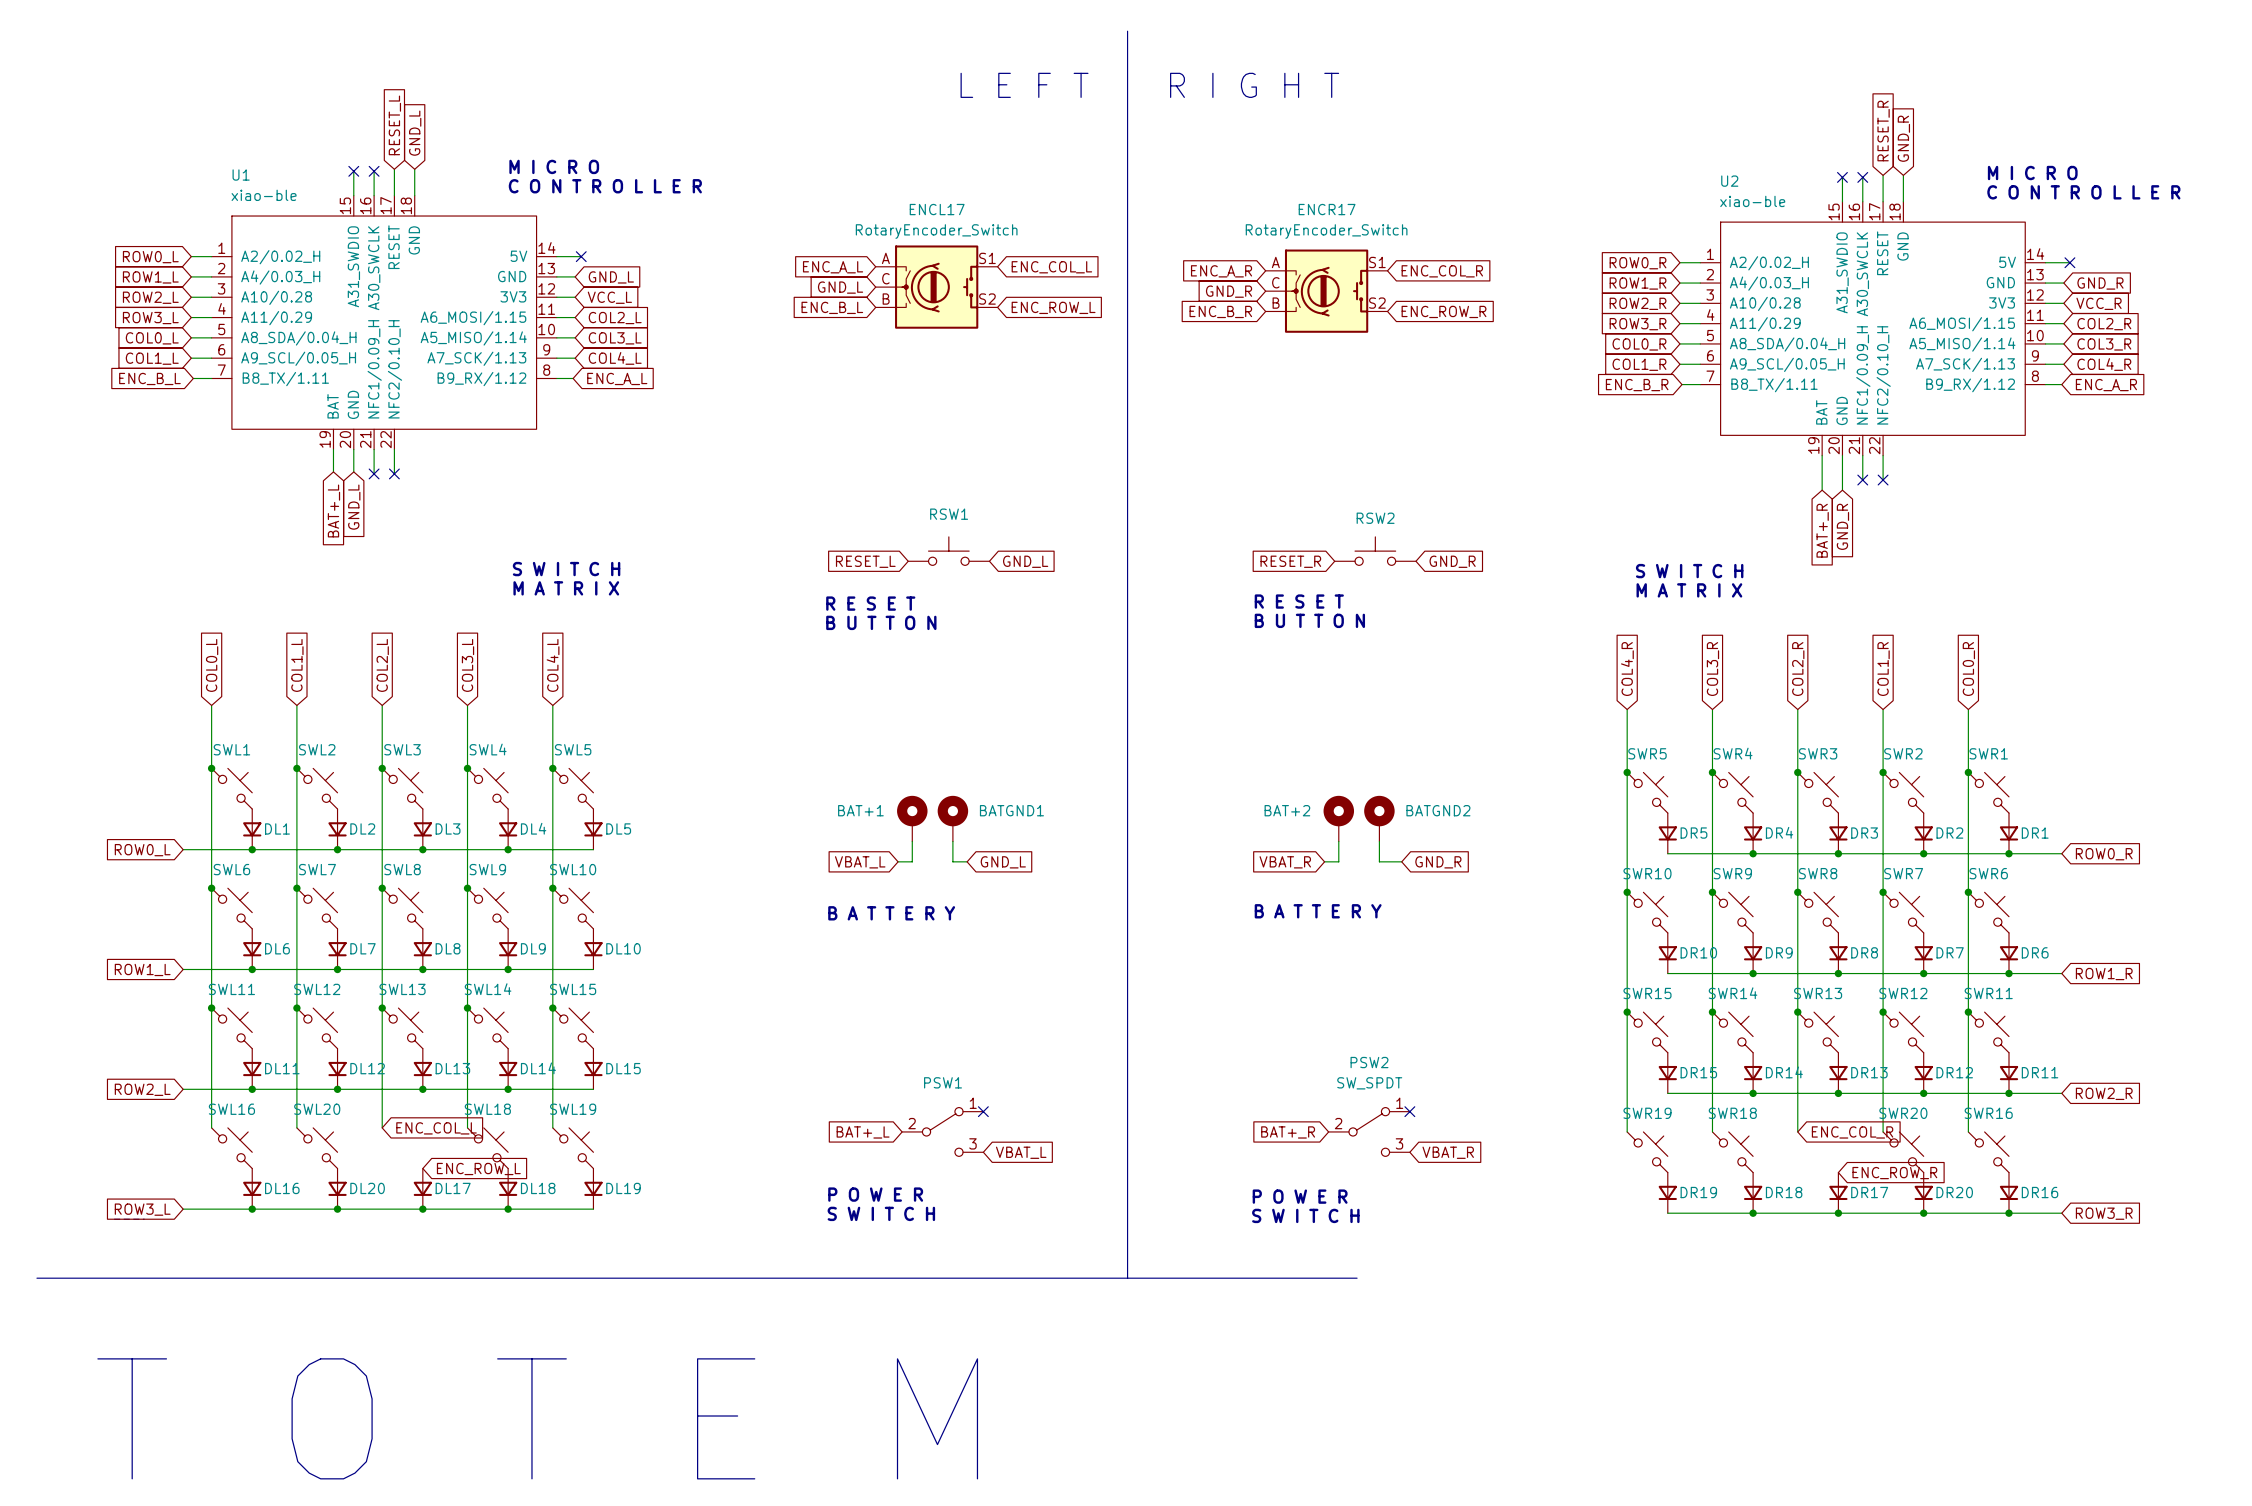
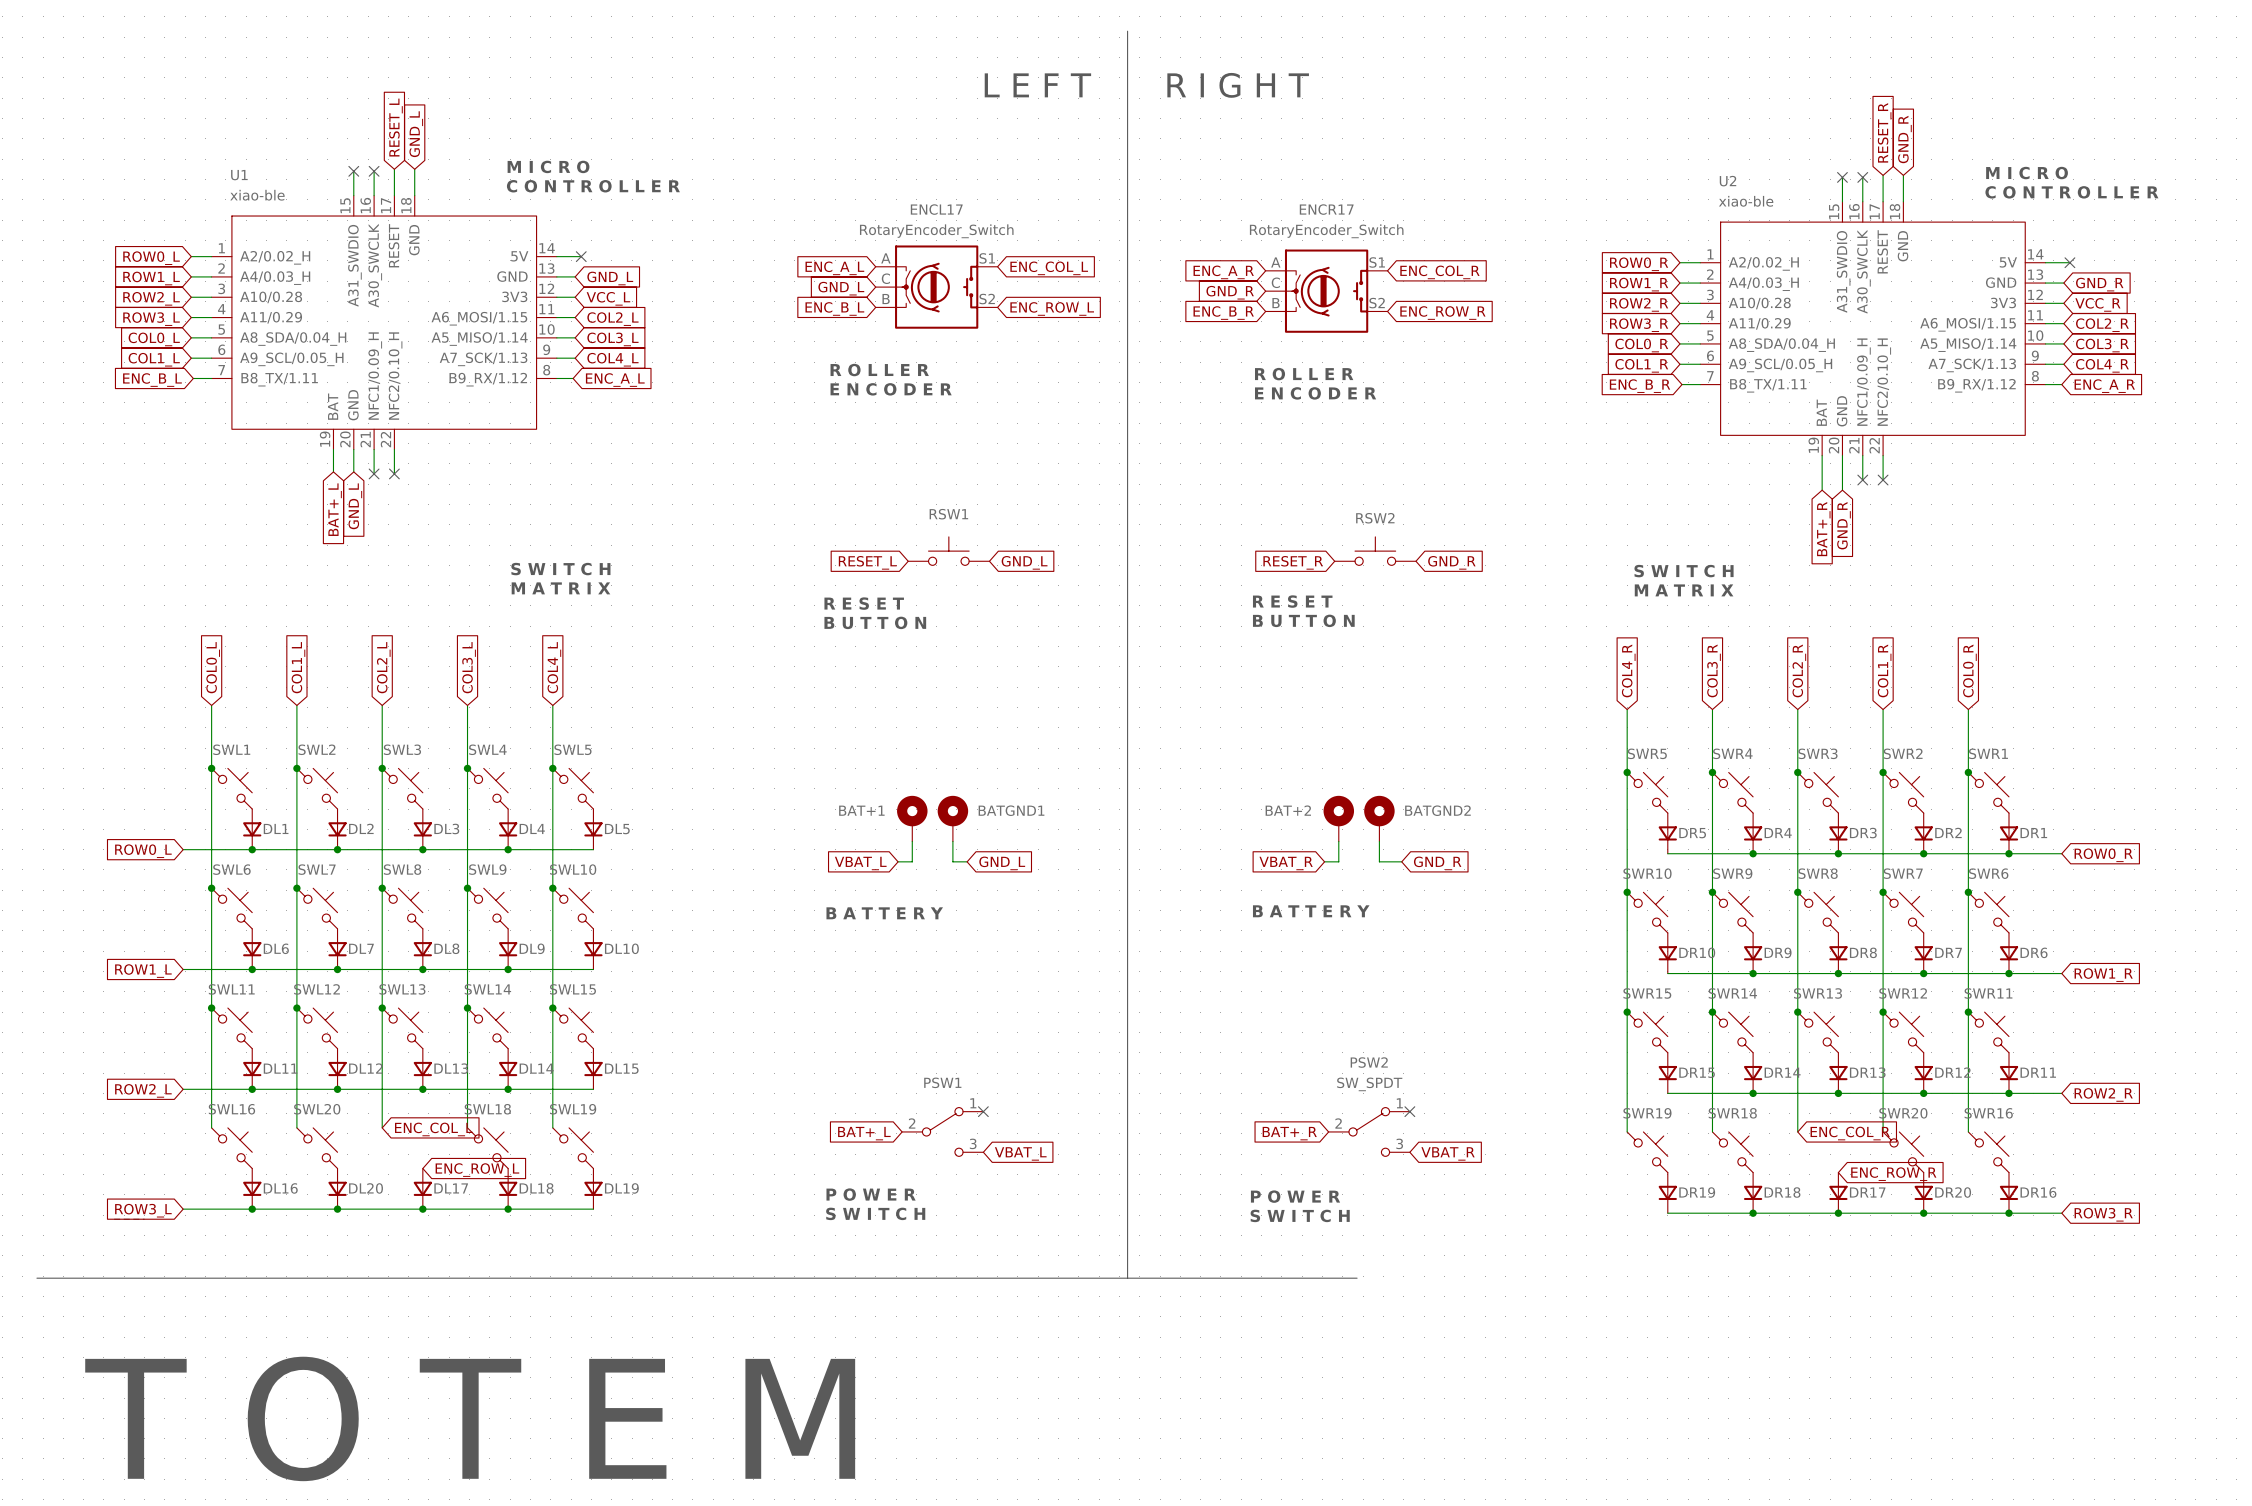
text: none -> R O L L E R (879, 370)
text: none -> R O L L E R (1304, 374)
text: none -> E N C O D E R (891, 389)
text: none -> E N C O D E R (1315, 393)

